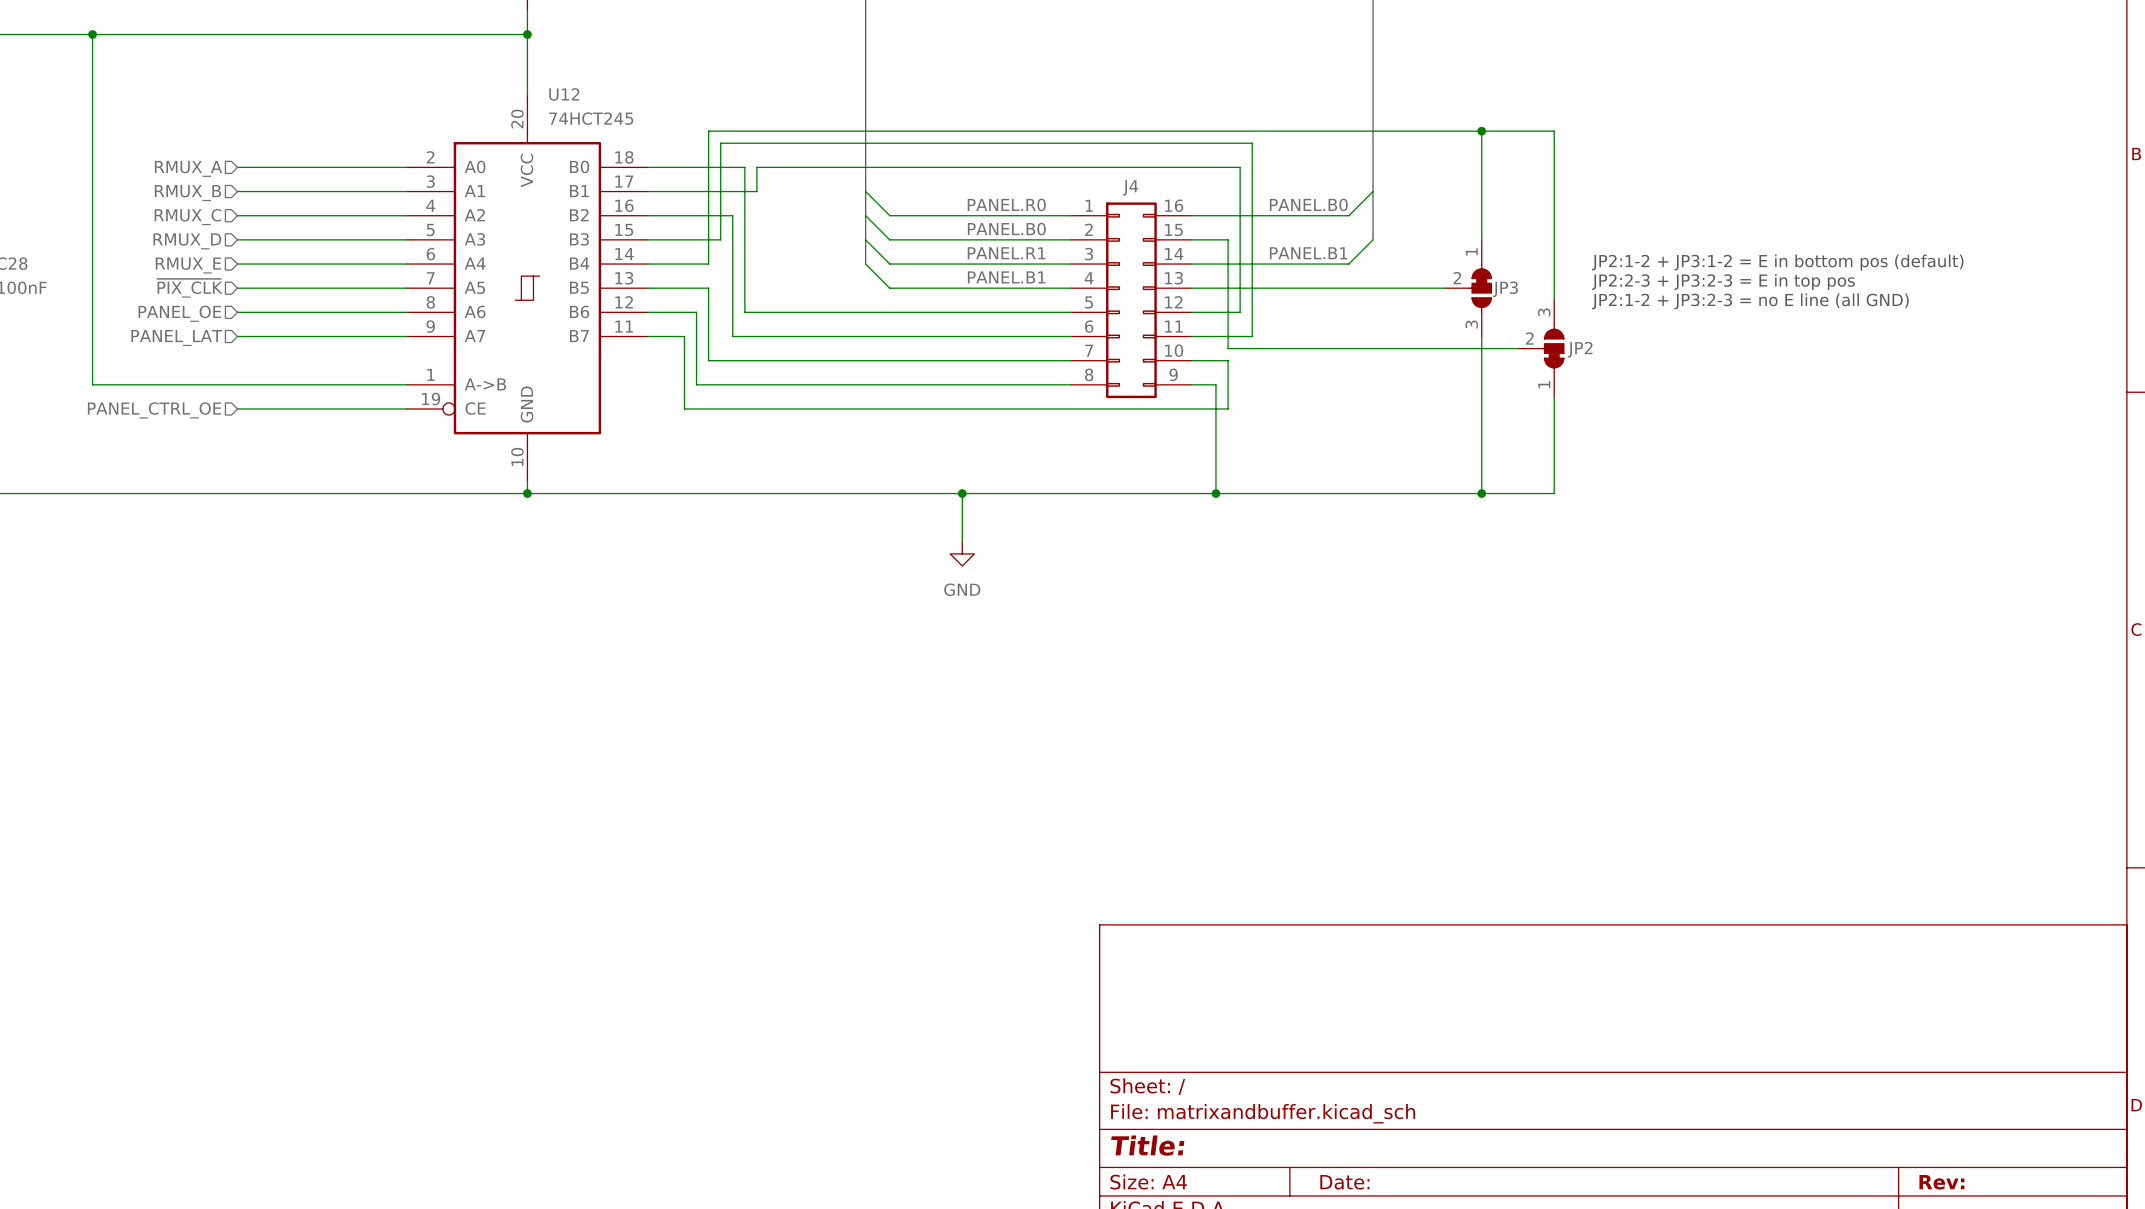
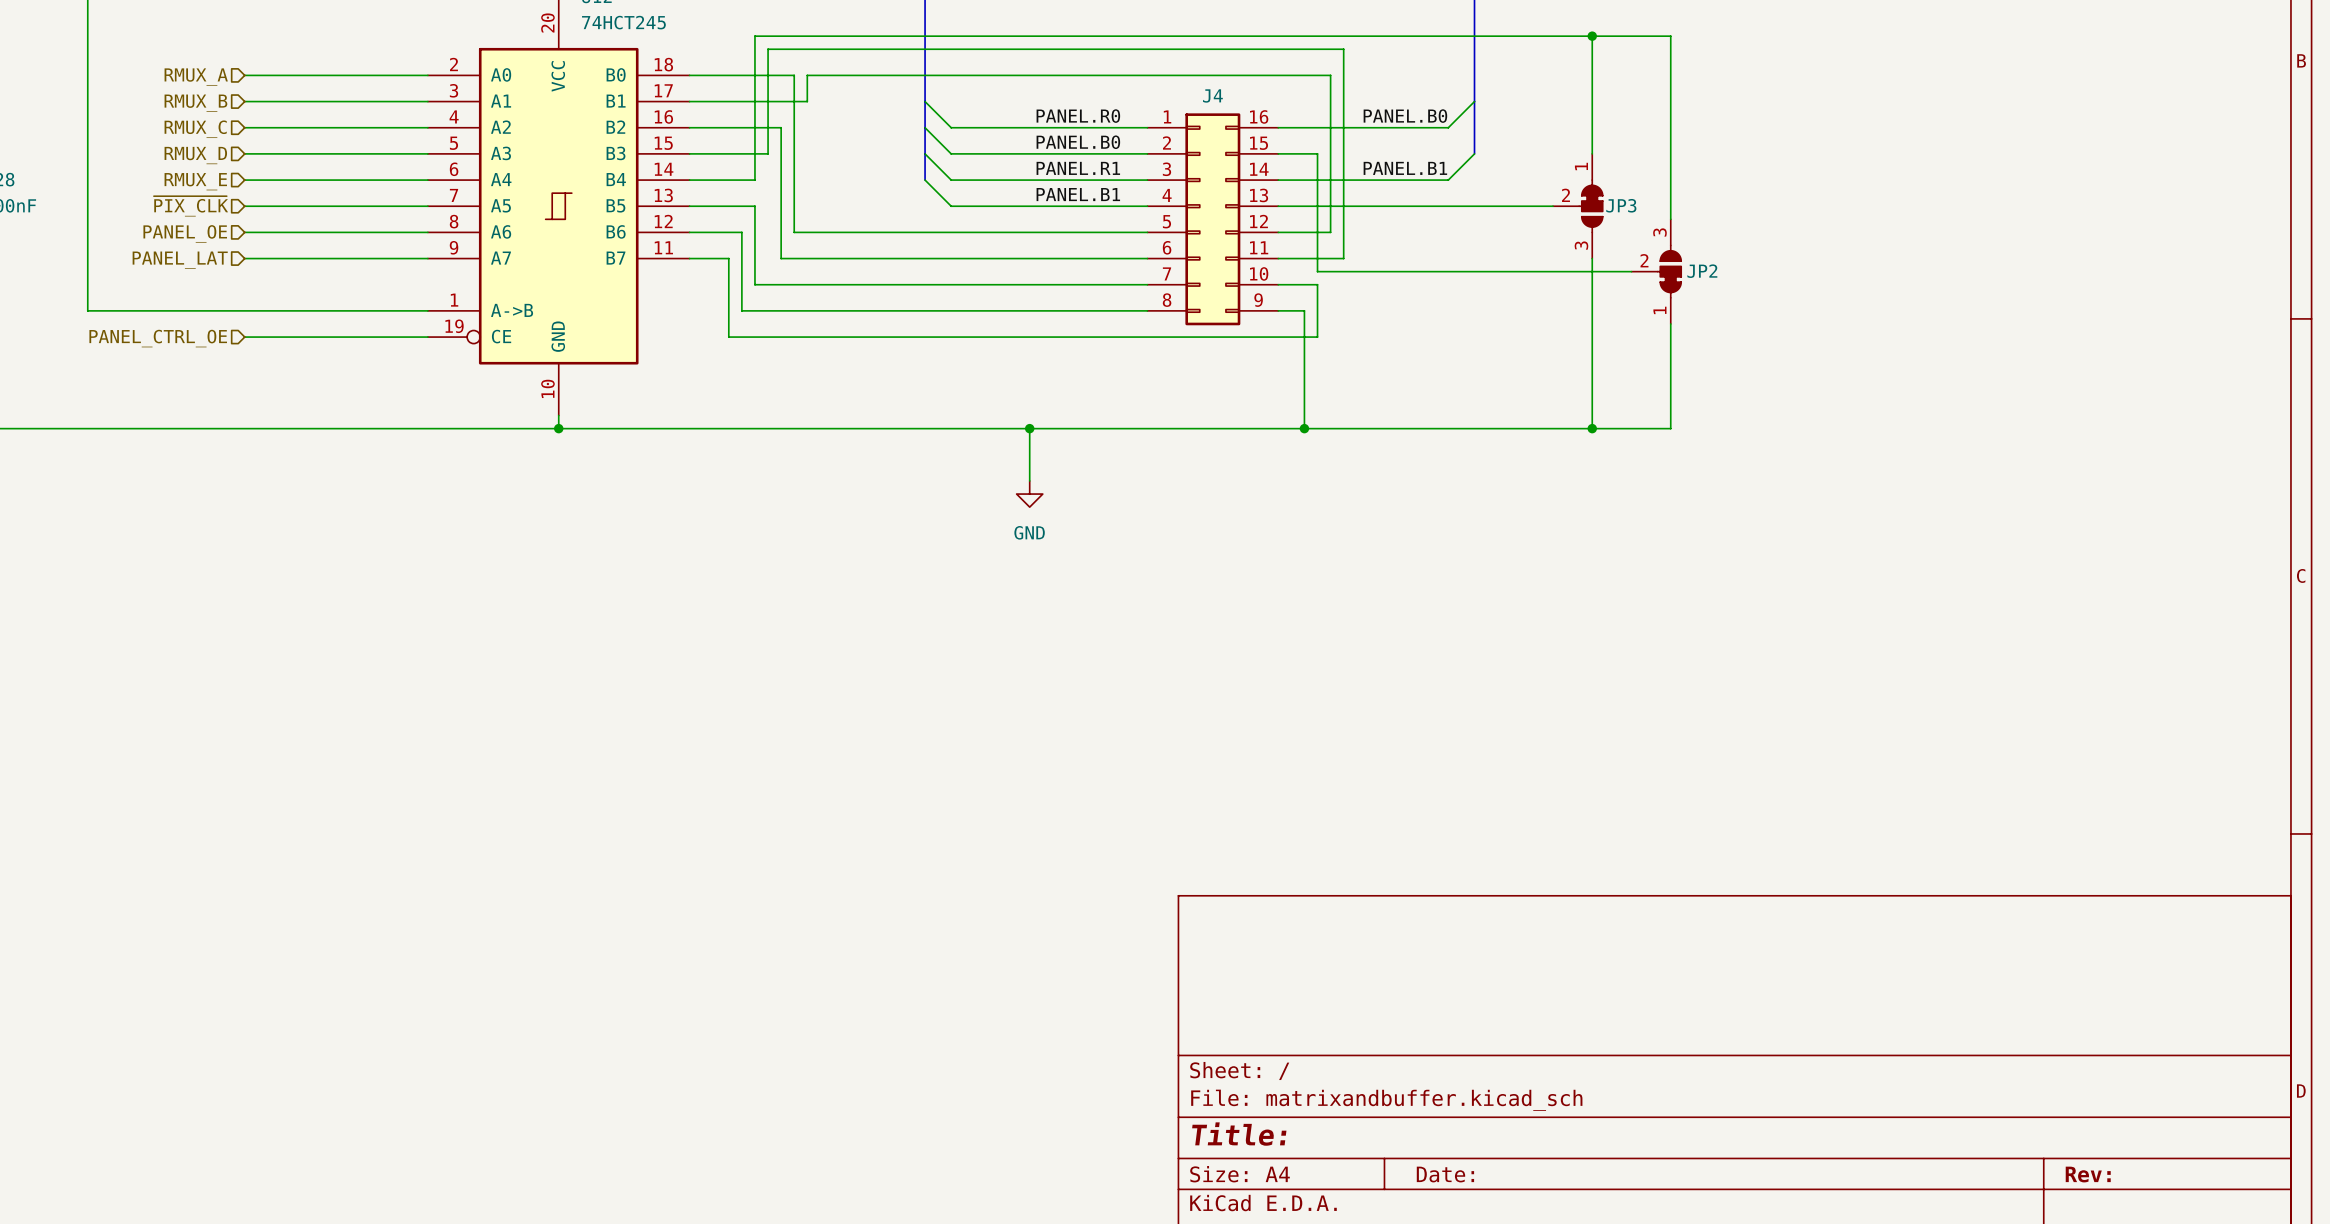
text: JP2:1-2 + JP3:1-2 = E in bottom pos (default) (1777, 262) -> none
text: JP2:2-3 + JP3:2-3 = E in top pos (1723, 281) -> none
text: JP2:1-2 + JP3:2-3 = no E line (all GND) (1750, 301) -> none

